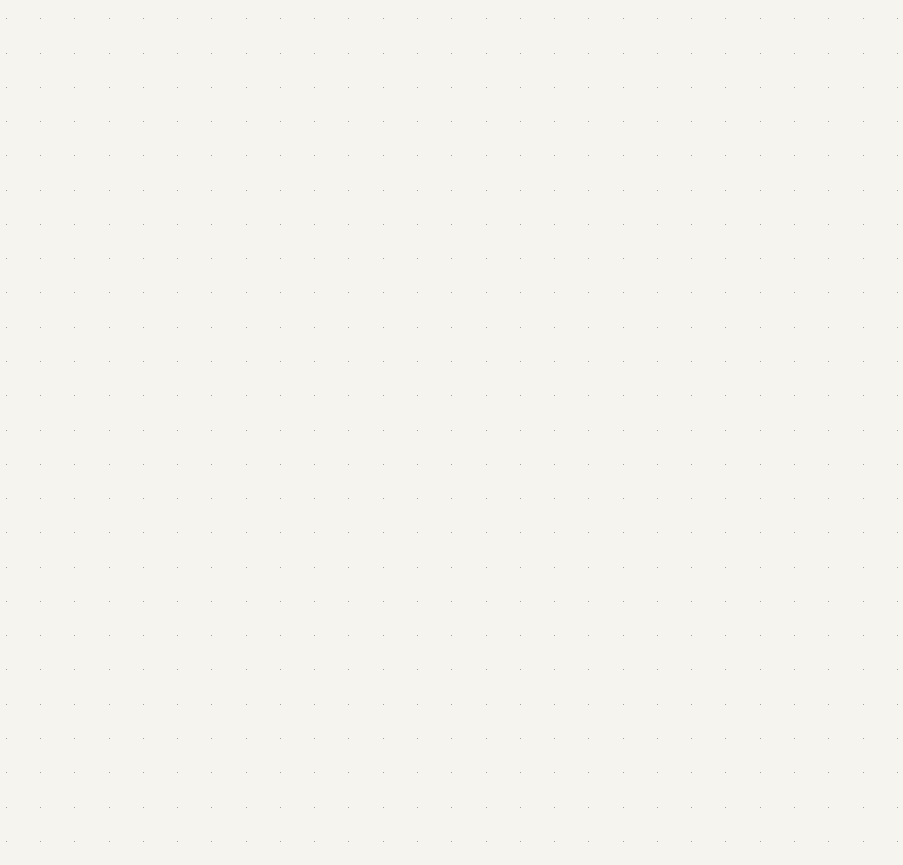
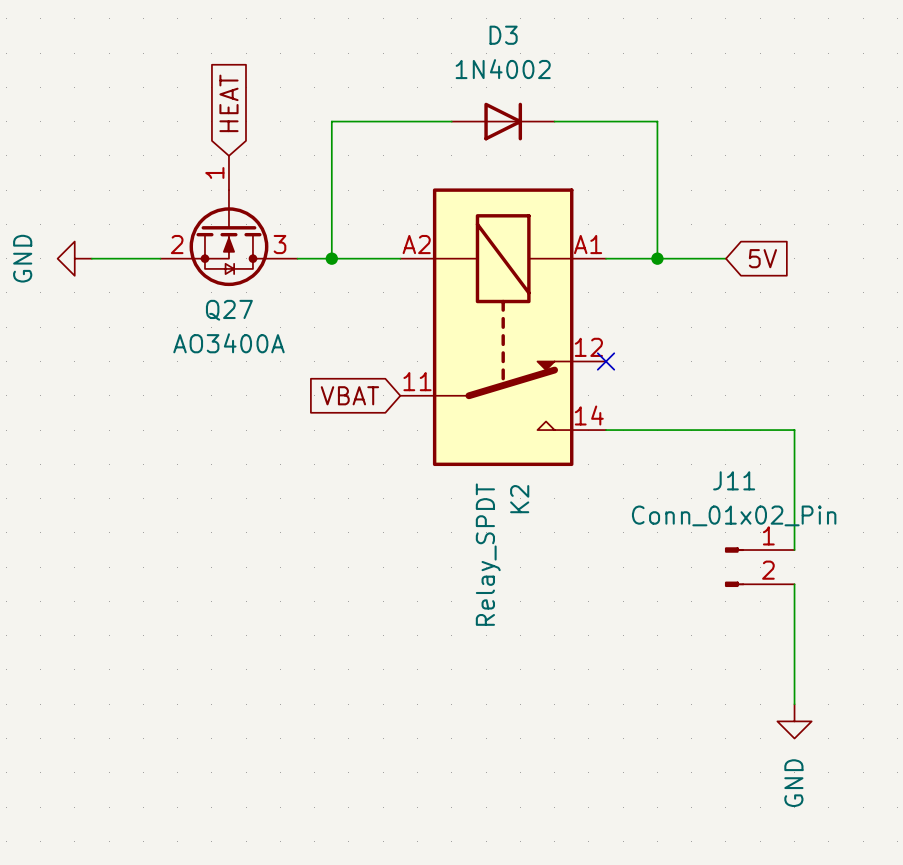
global label: none -> HEAT (228, 103)
wire: none -> (451, 121) (331, 121) (331, 258)
D3: none -> 1N4002 (503, 121)
wire: none -> (554, 121) (657, 121) (657, 258)
Q27: none -> AO3400A (228, 220)
power symbol: none -> GND (74, 258)
wire: none -> (91, 258) (160, 258)
wire: none -> (297, 258) (400, 258)
junction: none -> (331, 258)
wire: none -> (606, 258) (725, 258)
junction: none -> (657, 258)
global label: none -> 5V (762, 258)
K2: none -> Relay_SPDT (503, 327)
no-connect mark: none -> (606, 361)
global label: none -> VBAT (349, 395)
wire: none -> (606, 430) (794, 430) (794, 550)
J11: none -> Conn_01x02_Pin (759, 567)
wire: none -> (794, 584) (794, 704)
power symbol: none -> GND (794, 721)

